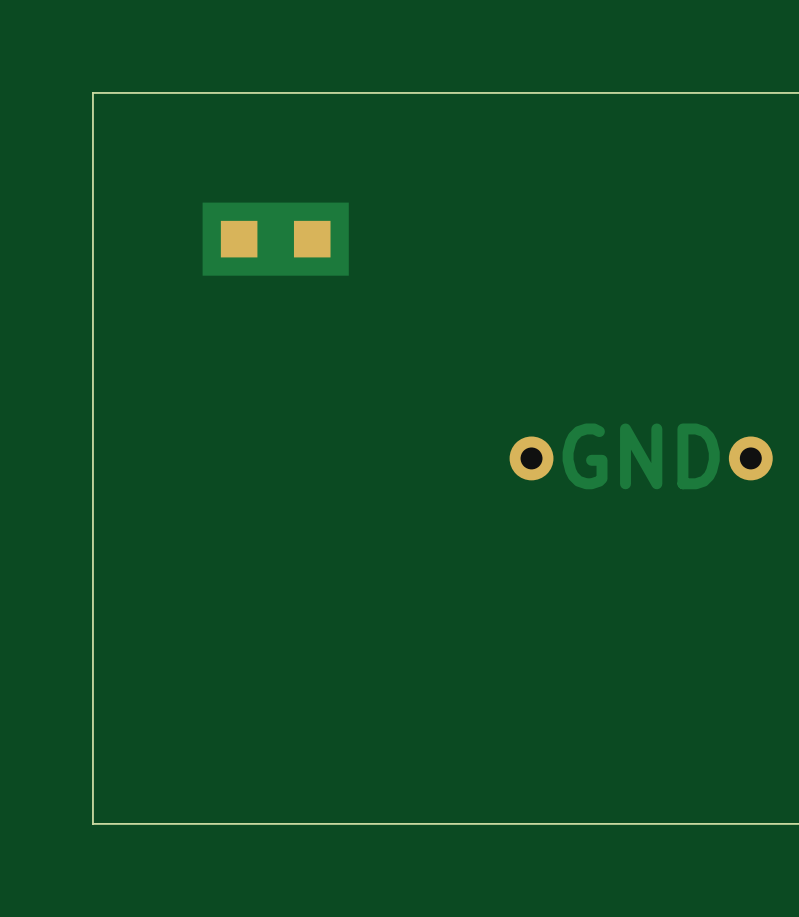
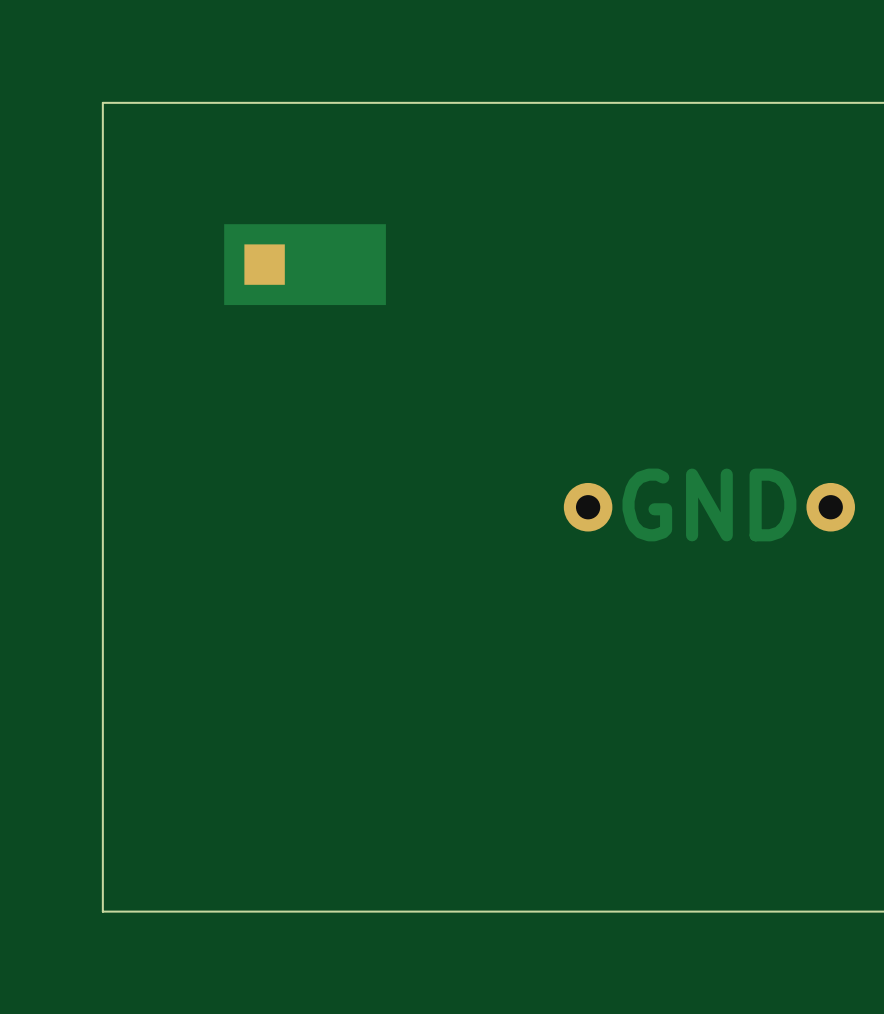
part: (312, 239) -> none

